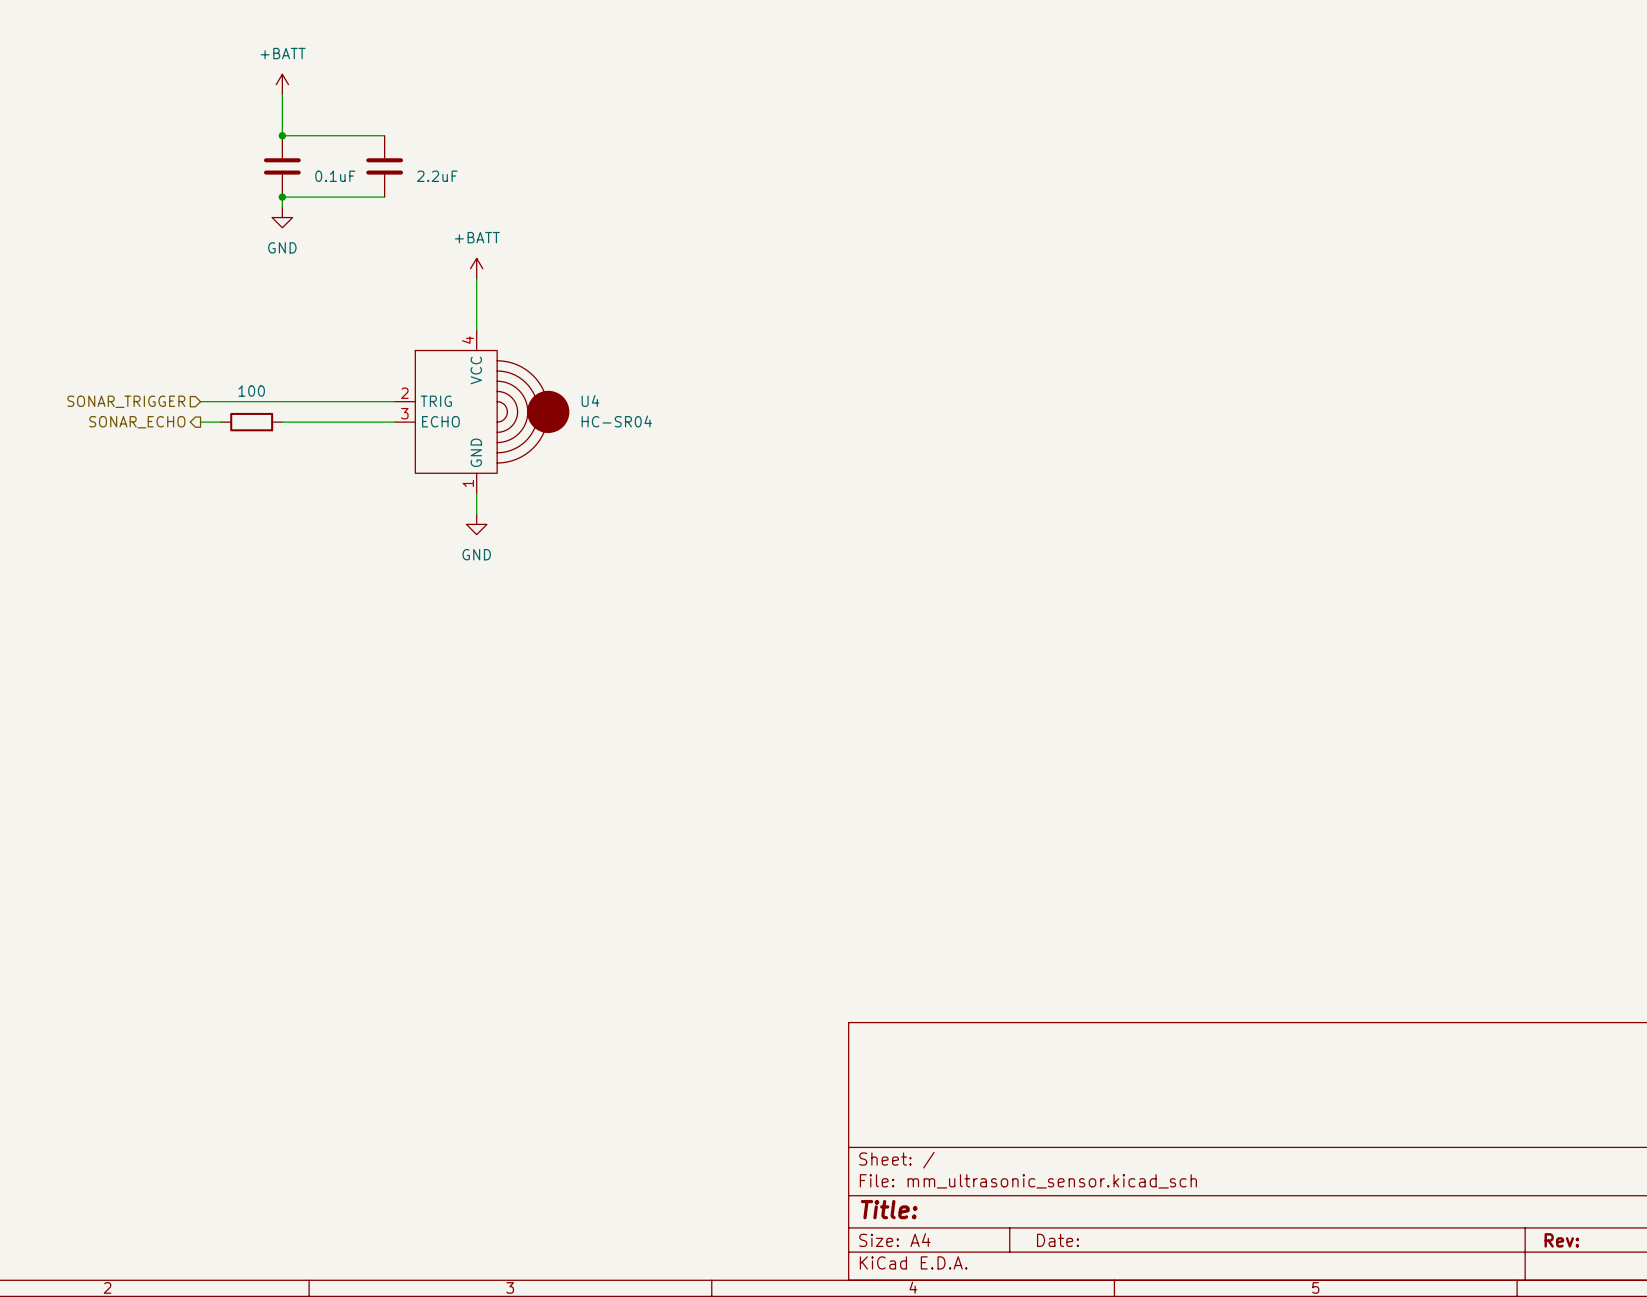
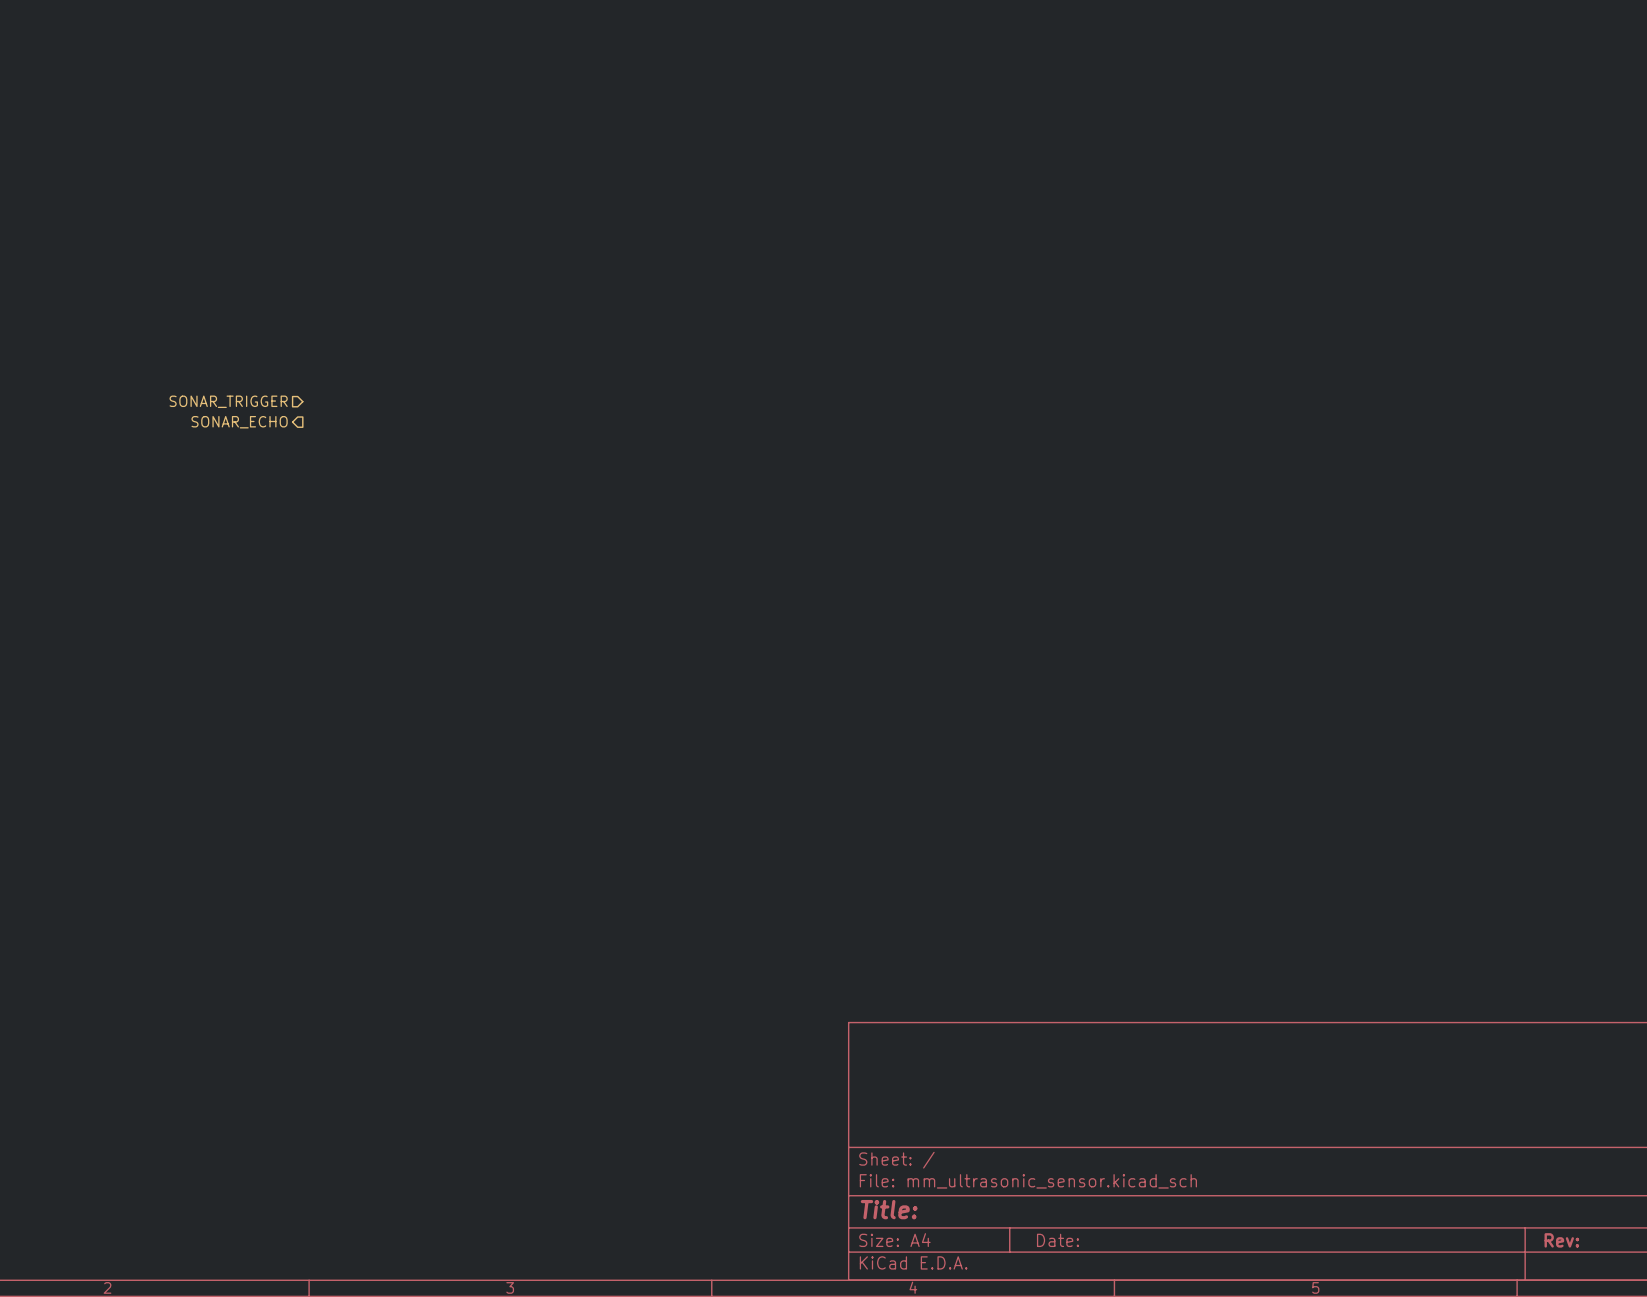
power symbol: +BATT (282, 84) -> none
wire: (282, 94) (282, 135) (384, 135) -> none
junction: (282, 135) -> none
part: 0.1uF (282, 166) -> none
part: 2.2uF (384, 166) -> none
junction: (282, 197) -> none
wire: (384, 197) (282, 197) (282, 207) -> none
power symbol: GND (282, 217) -> none
power symbol: +BATT (476, 268) -> none
wire: (476, 278) (476, 330) -> none
hierarchical label position: SONAR_TRIGGER (126, 401) -> SONAR_TRIGGER (228, 401)
wire: (200, 401) (394, 401) -> none
U4: HC-SR04 (481, 411) -> none
hierarchical label position: SONAR_ECHO (137, 422) -> SONAR_ECHO (239, 422)
wire: (200, 422) (220, 422) -> none
part: 100 (251, 422) -> none
wire: (282, 422) (394, 422) -> none
wire: (476, 493) (476, 514) -> none
power symbol: GND (476, 524) -> none

